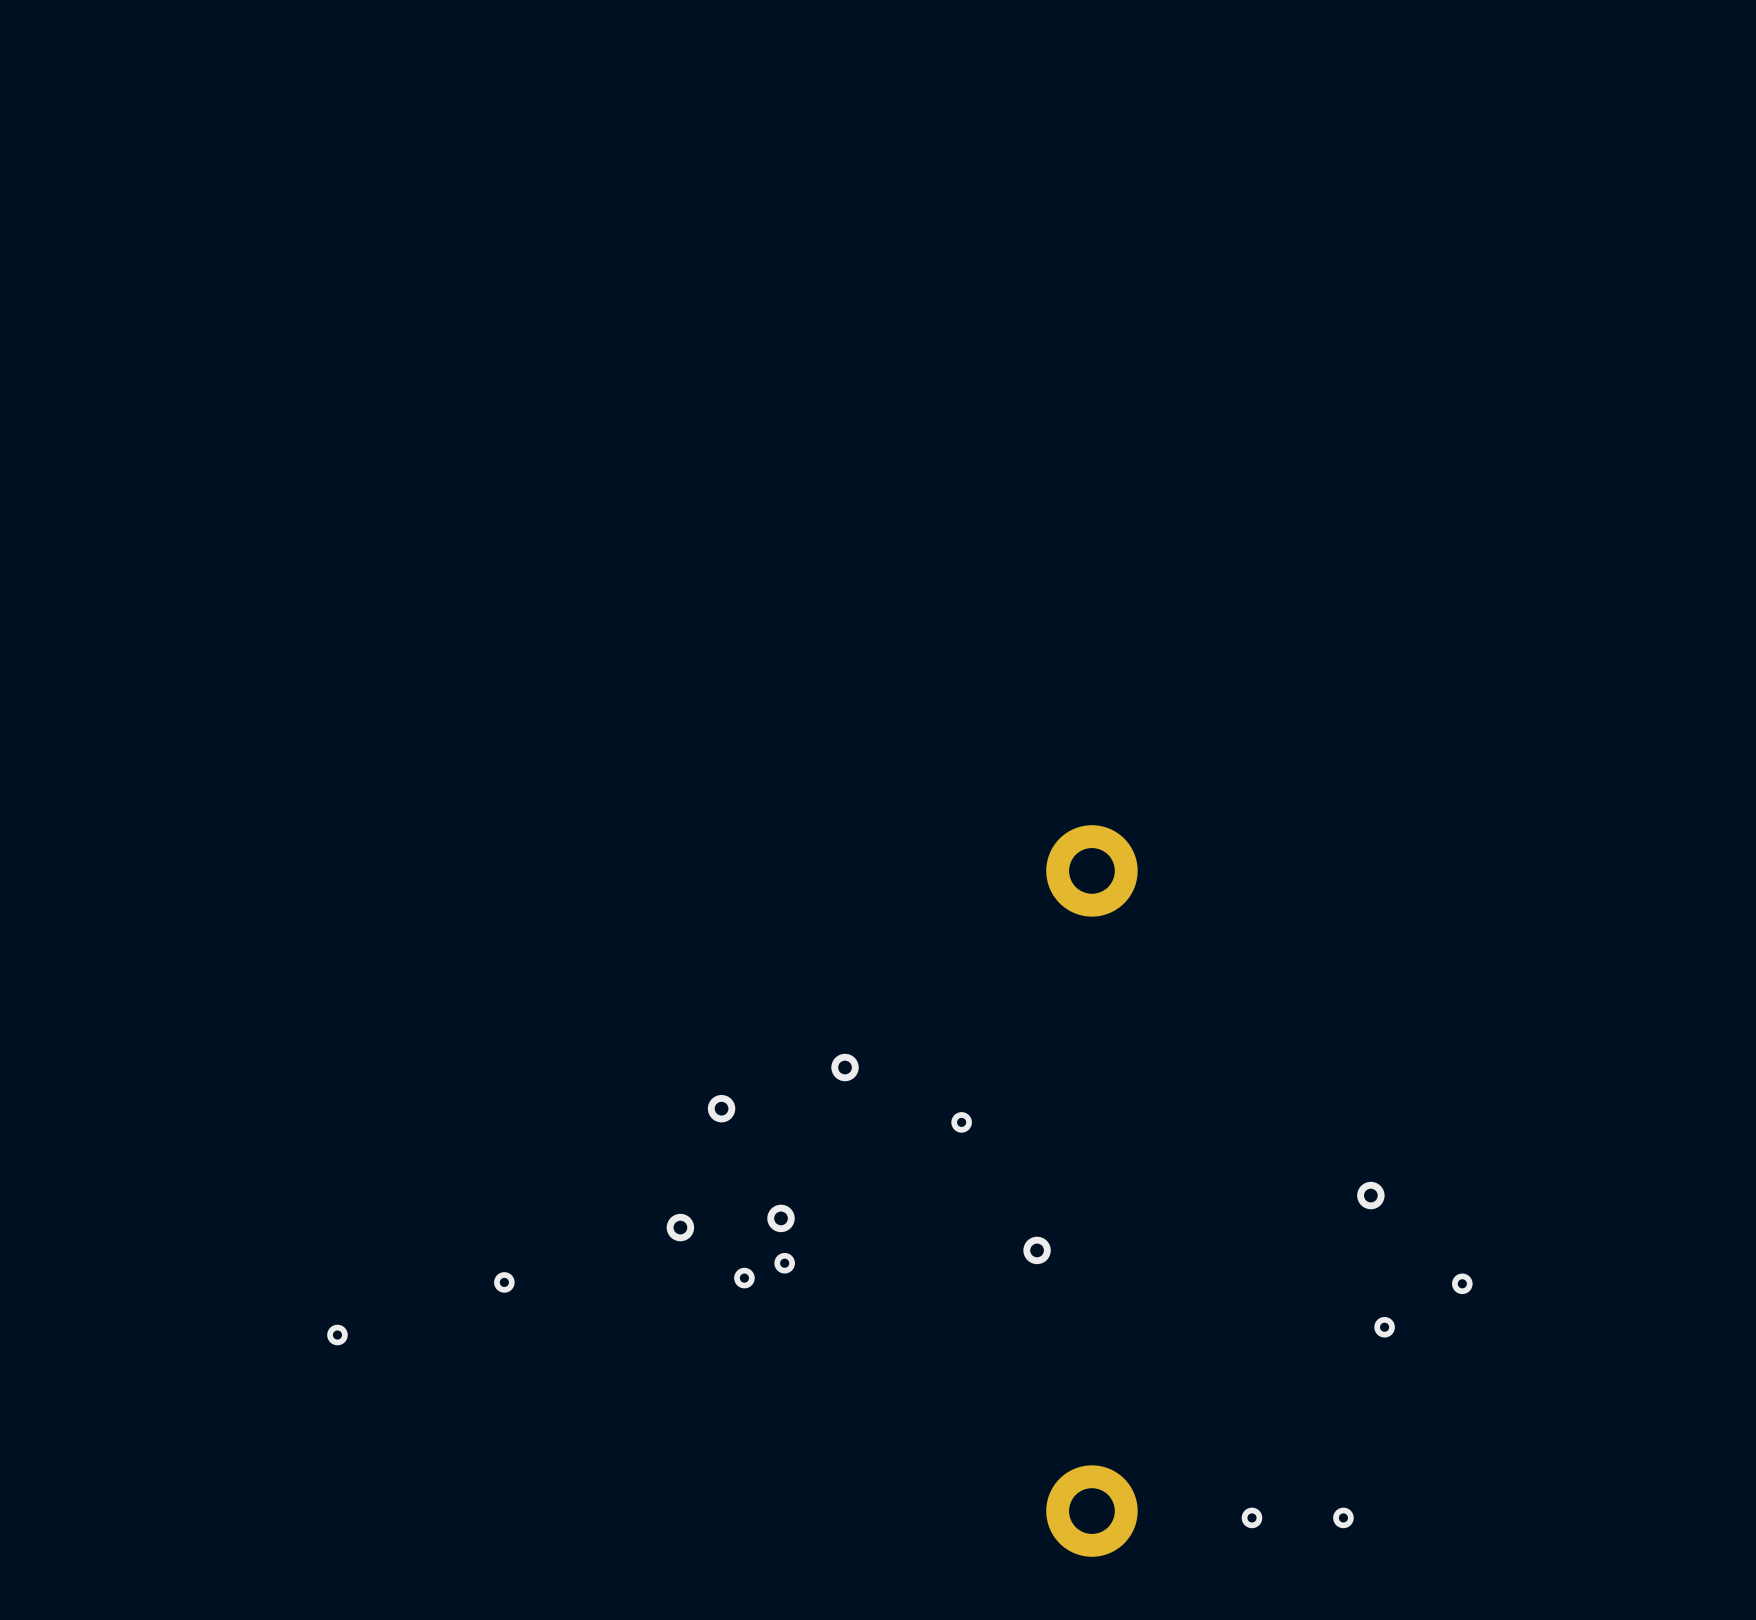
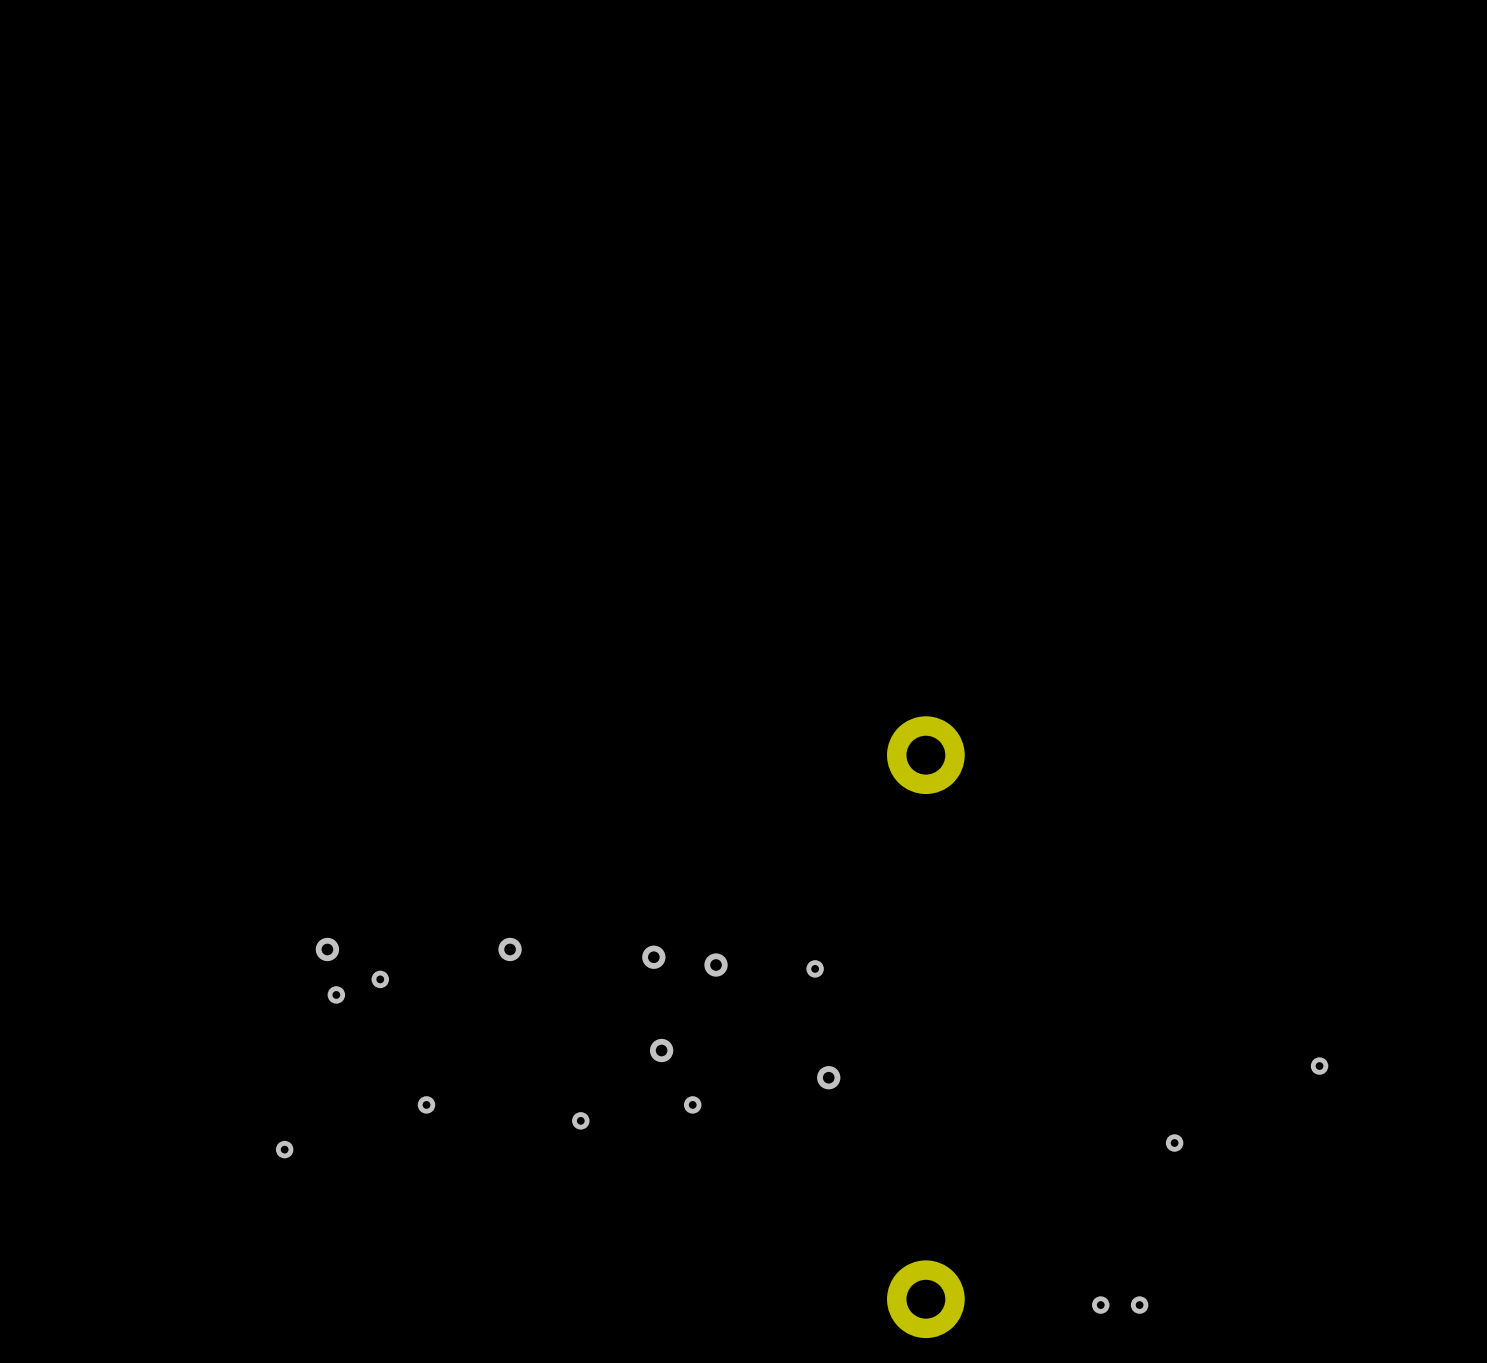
via: (845, 1067) -> none
via: none -> (327, 949)
via: none -> (510, 949)
via: (721, 1108) -> none
via: none -> (653, 957)
via: none -> (716, 965)
via: none -> (380, 979)
via: none -> (336, 994)
via: (1370, 1195) -> none
via: (680, 1227) -> none
via position: (1037, 1250) -> (828, 1077)
via: (784, 1263) -> none
via: (744, 1278) -> none
via: none -> (692, 1104)
via position: (1462, 1283) -> (1319, 1066)
via: none -> (580, 1120)
via position: (1251, 1517) -> (1100, 1305)

